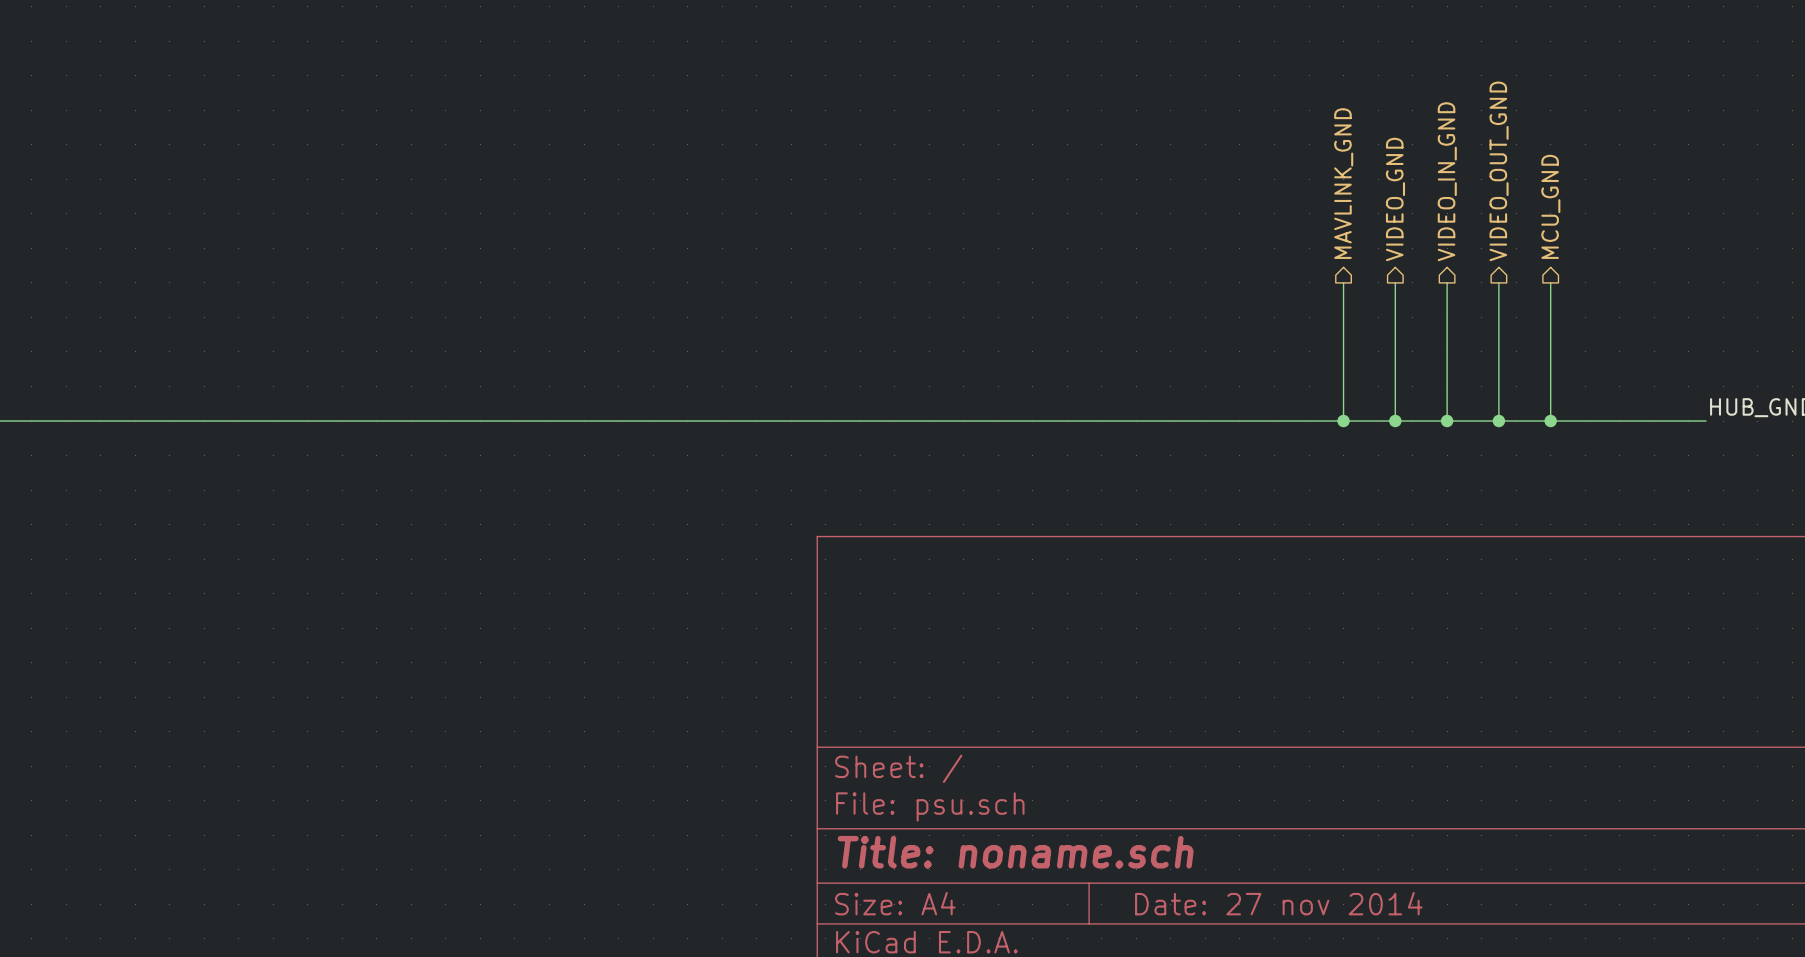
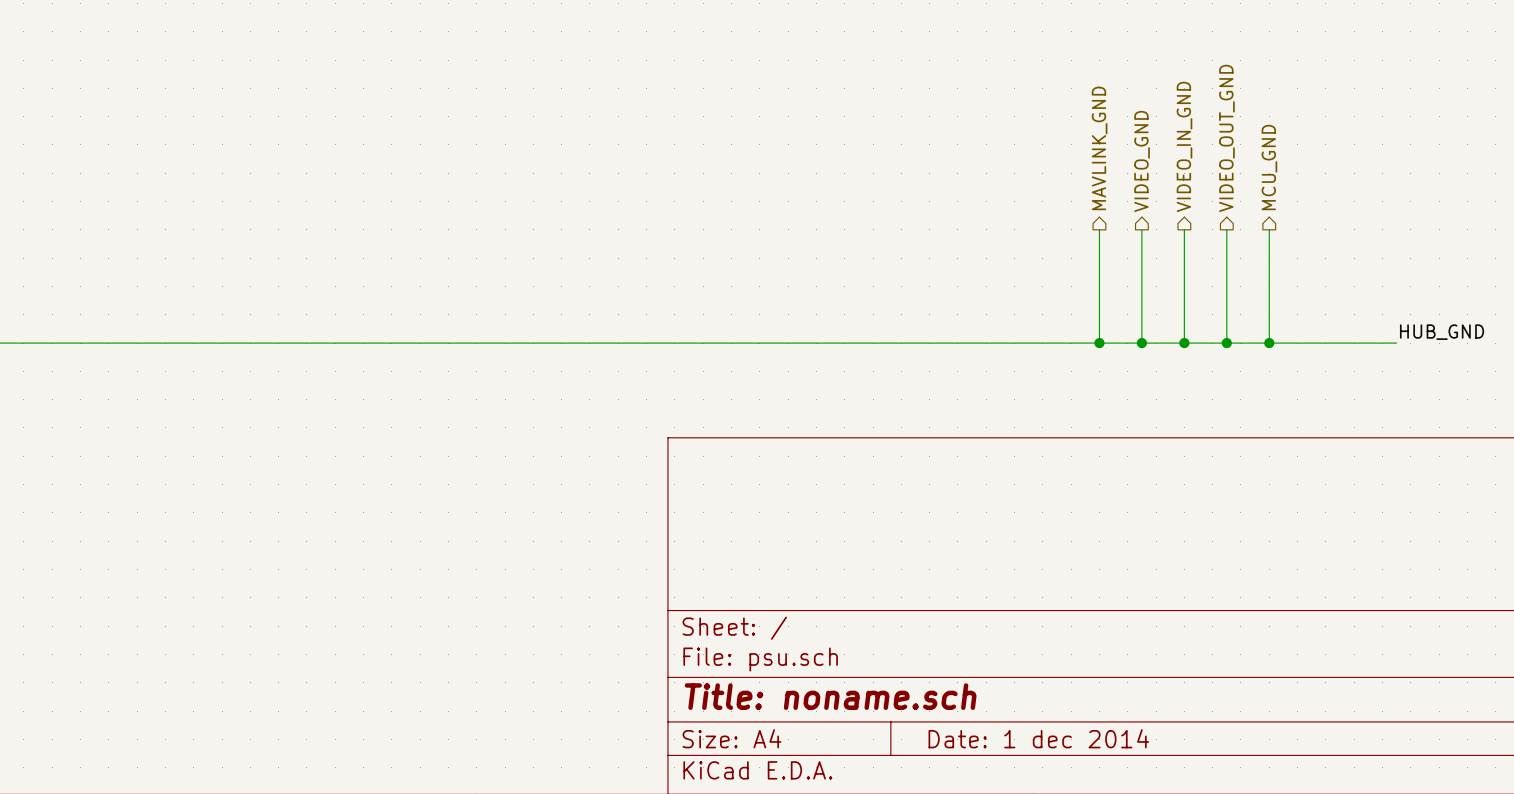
title block: Date: 27 nov 2014 (1278, 903) -> Date: 1 dec 2014 (1038, 738)

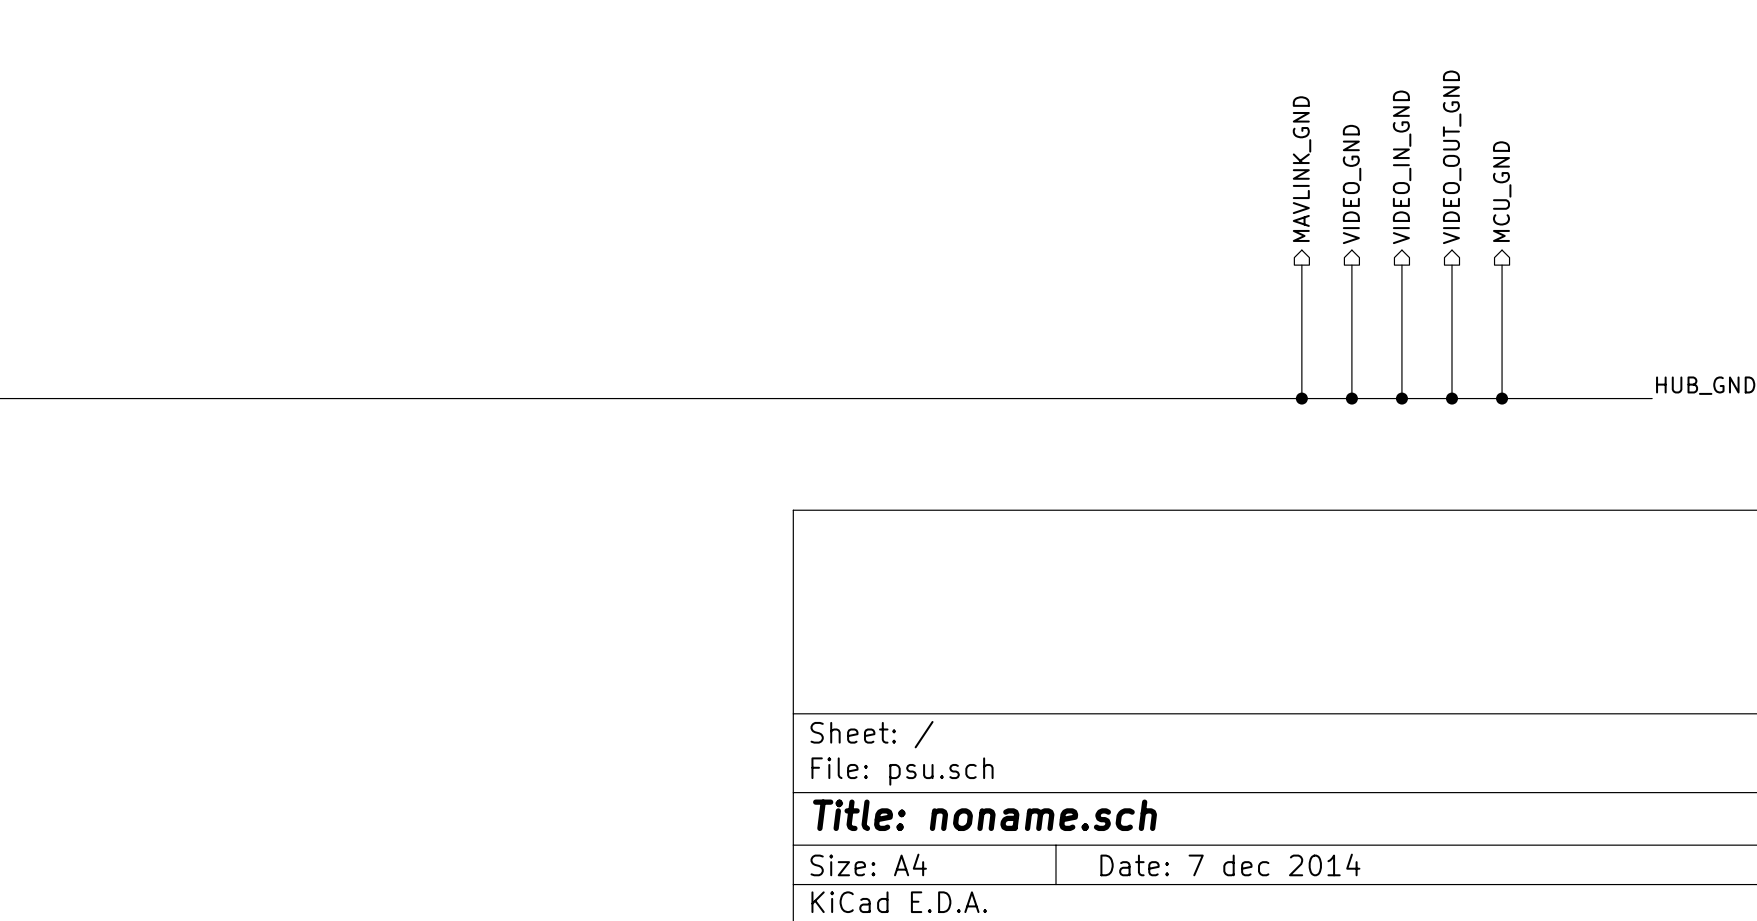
title block: Date: 1 dec 2014 (1038, 738) -> Date: 7 dec 2014 (1230, 864)

